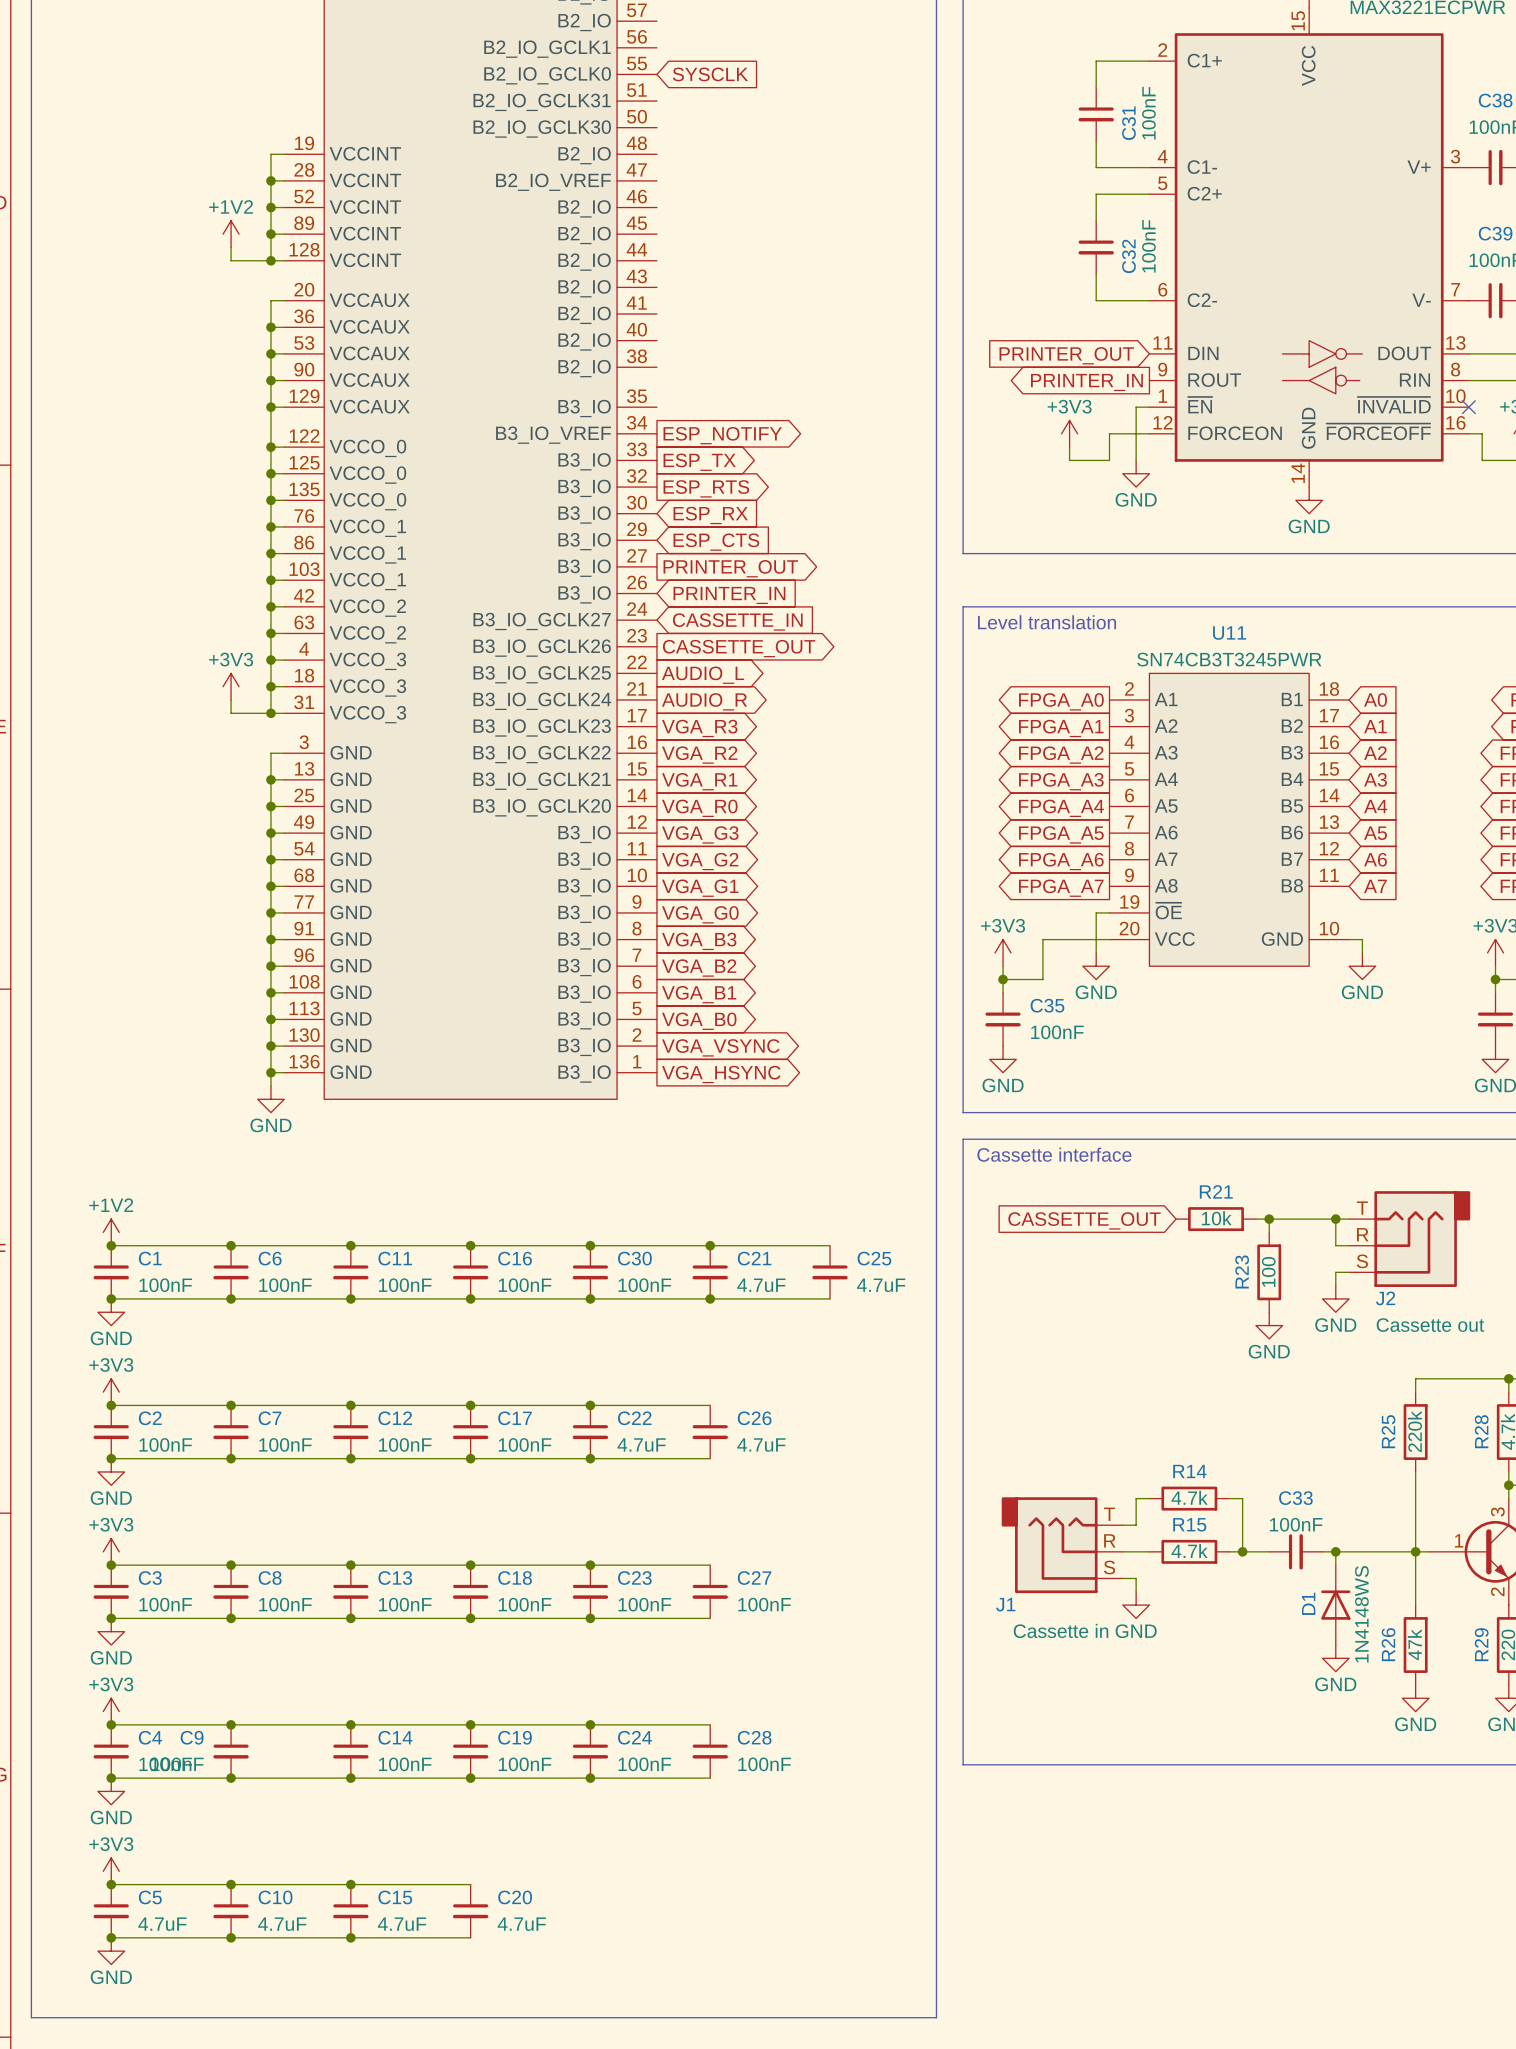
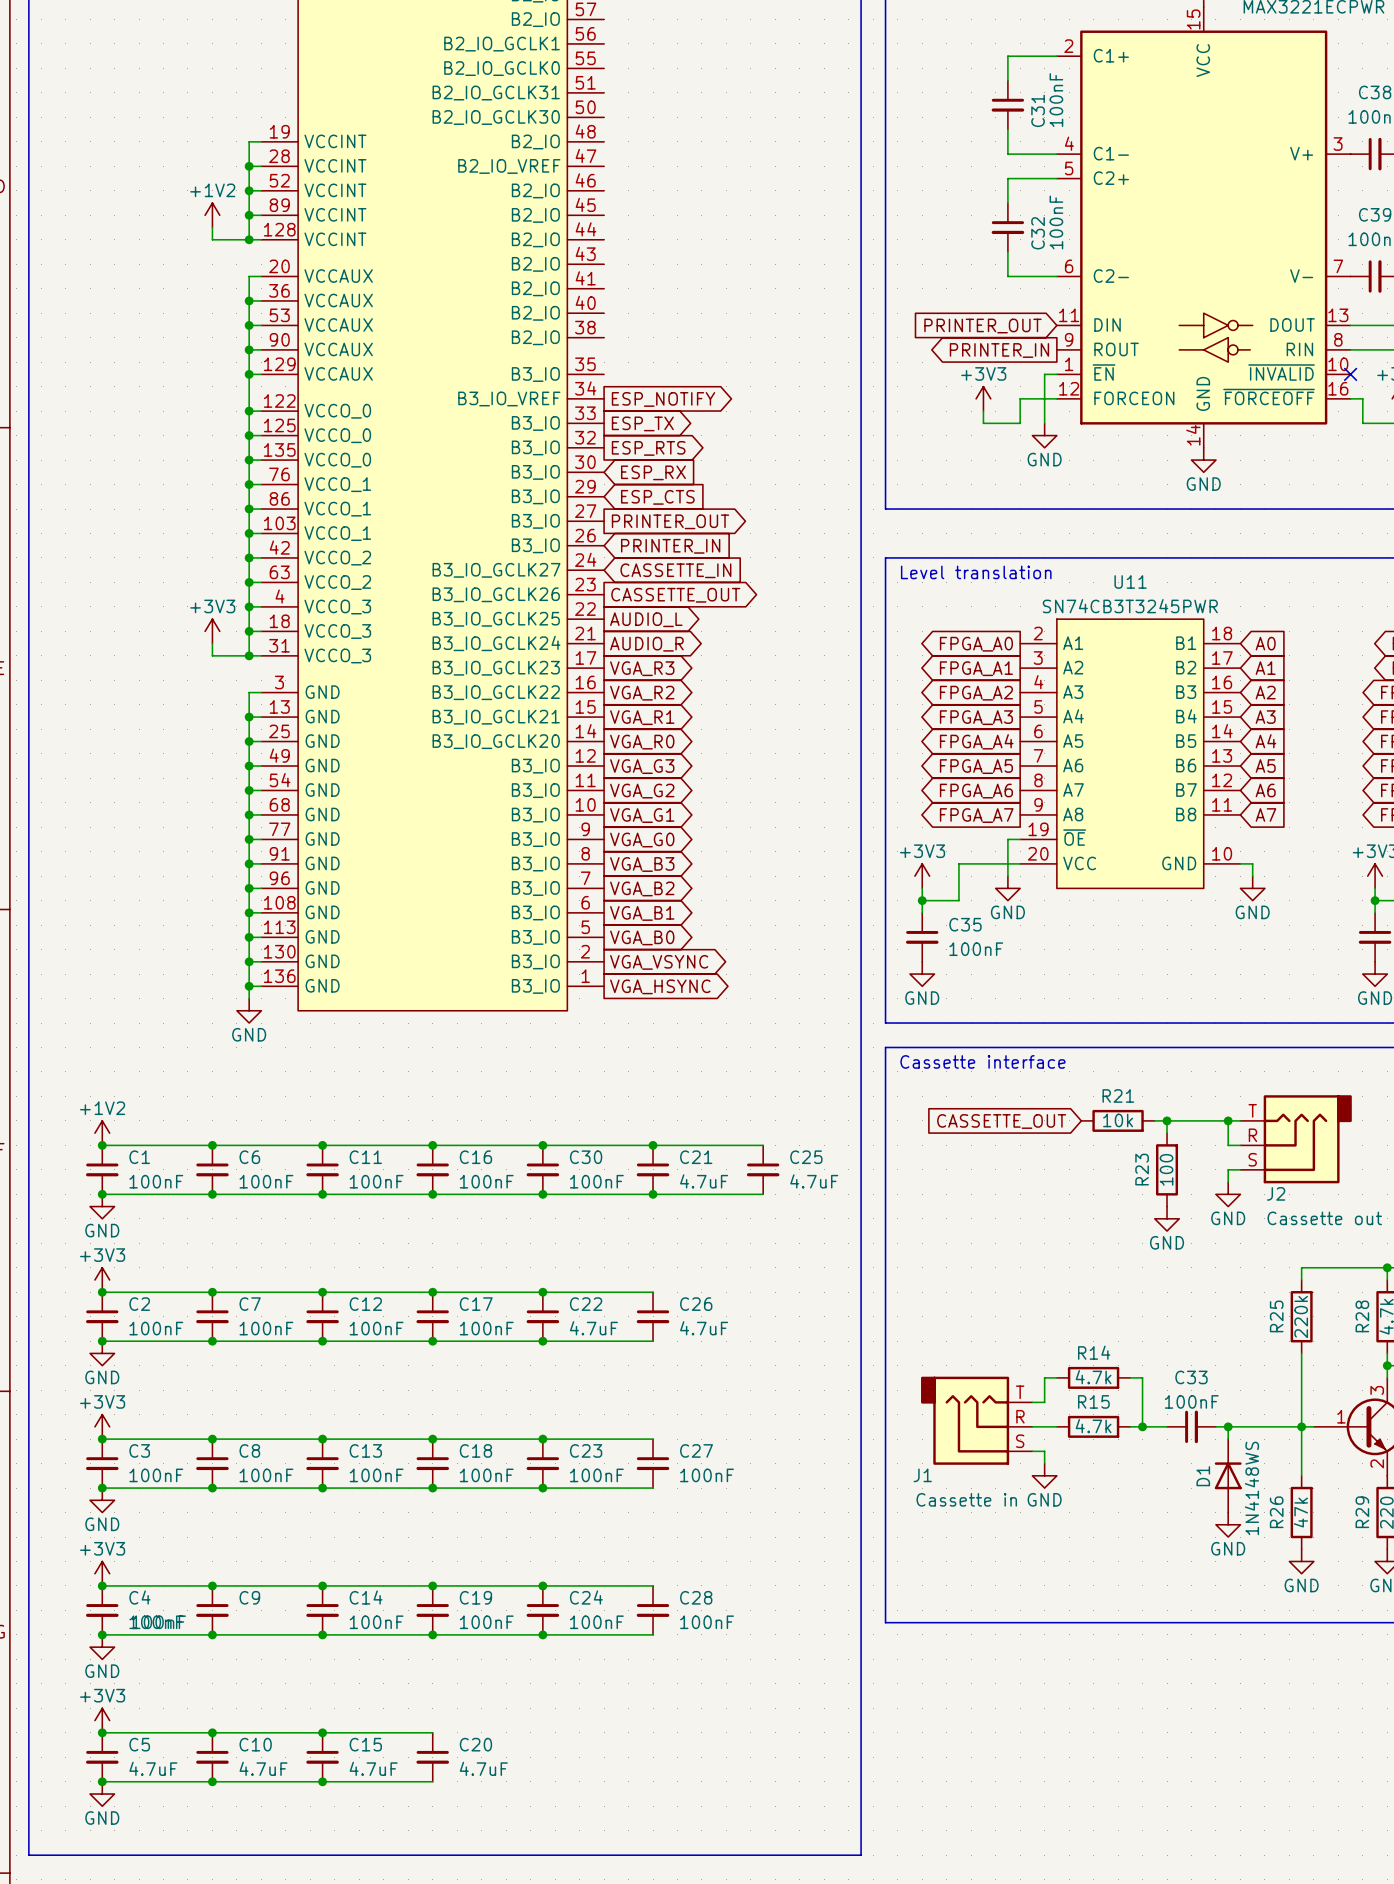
global label: SYSCLK (710, 74) -> none
C9 name position: C9 (192, 1737) -> C9 (249, 1597)

